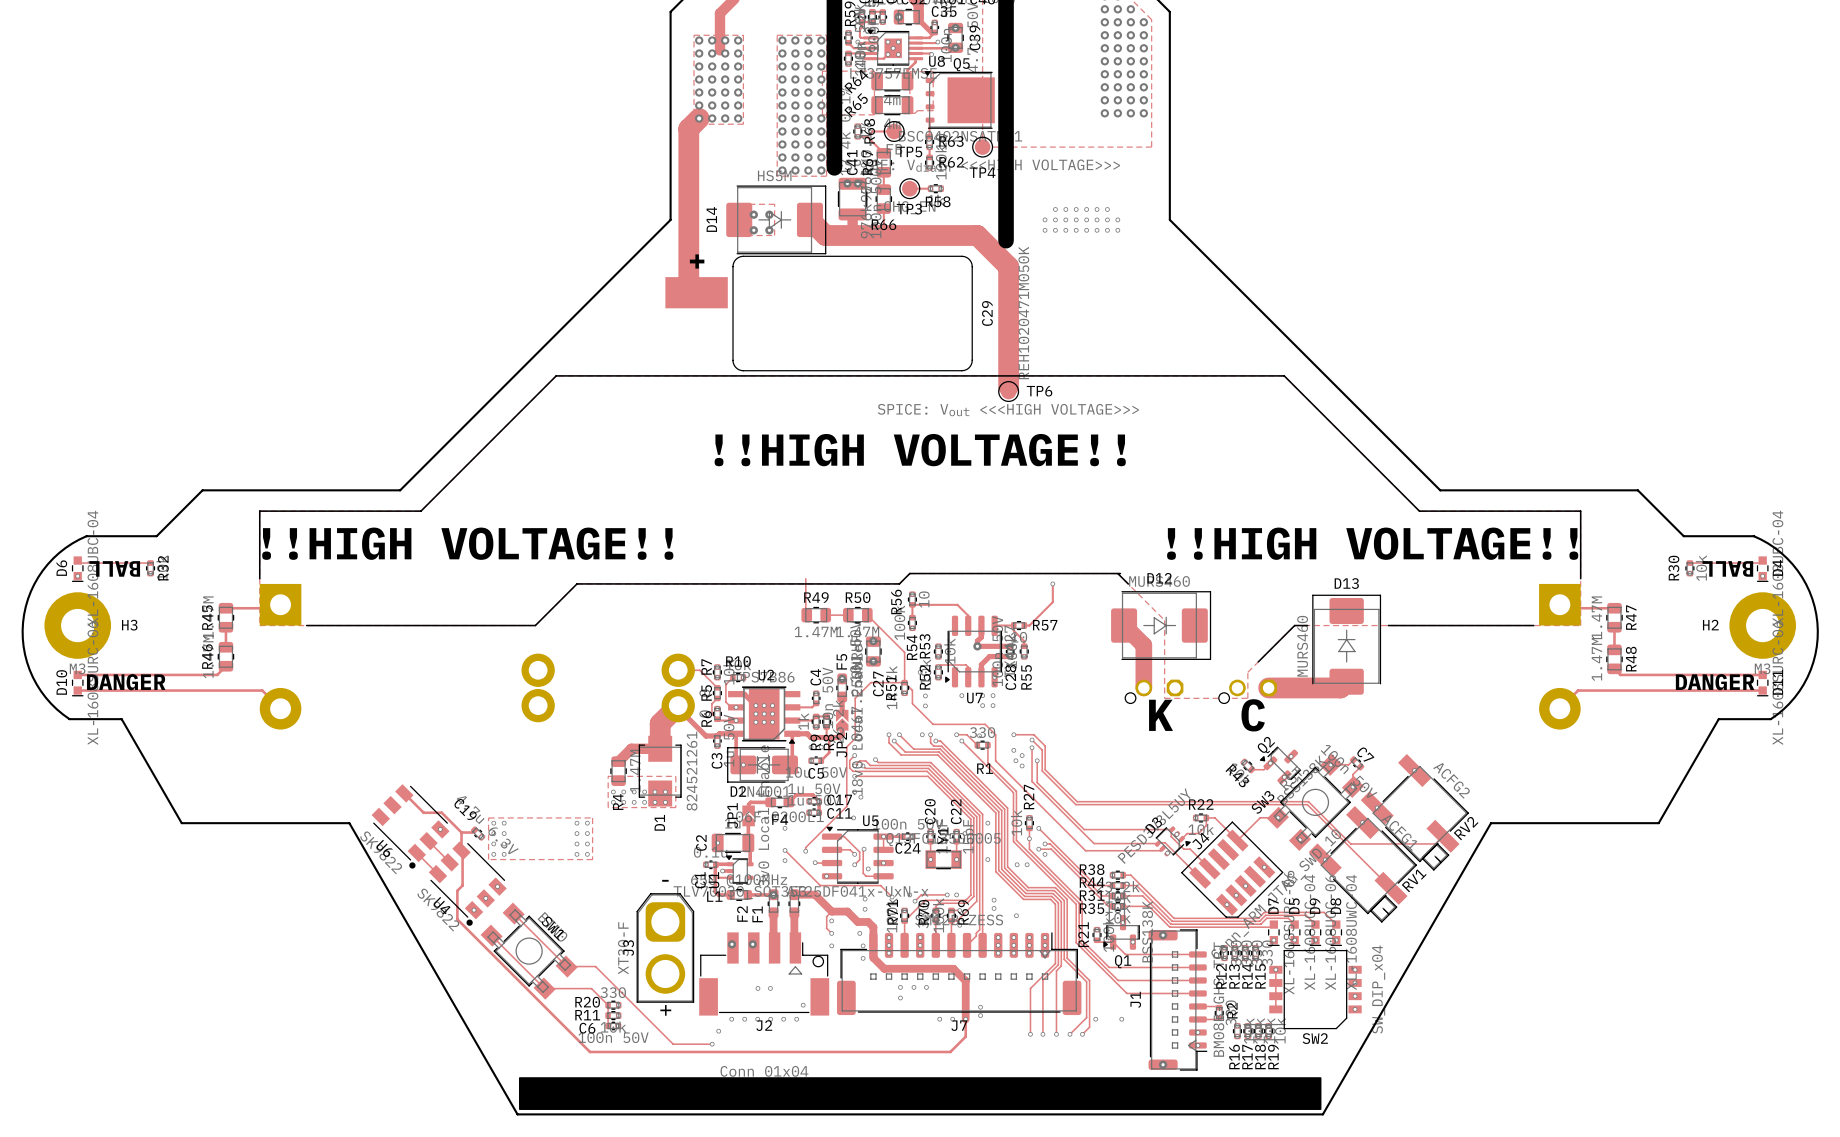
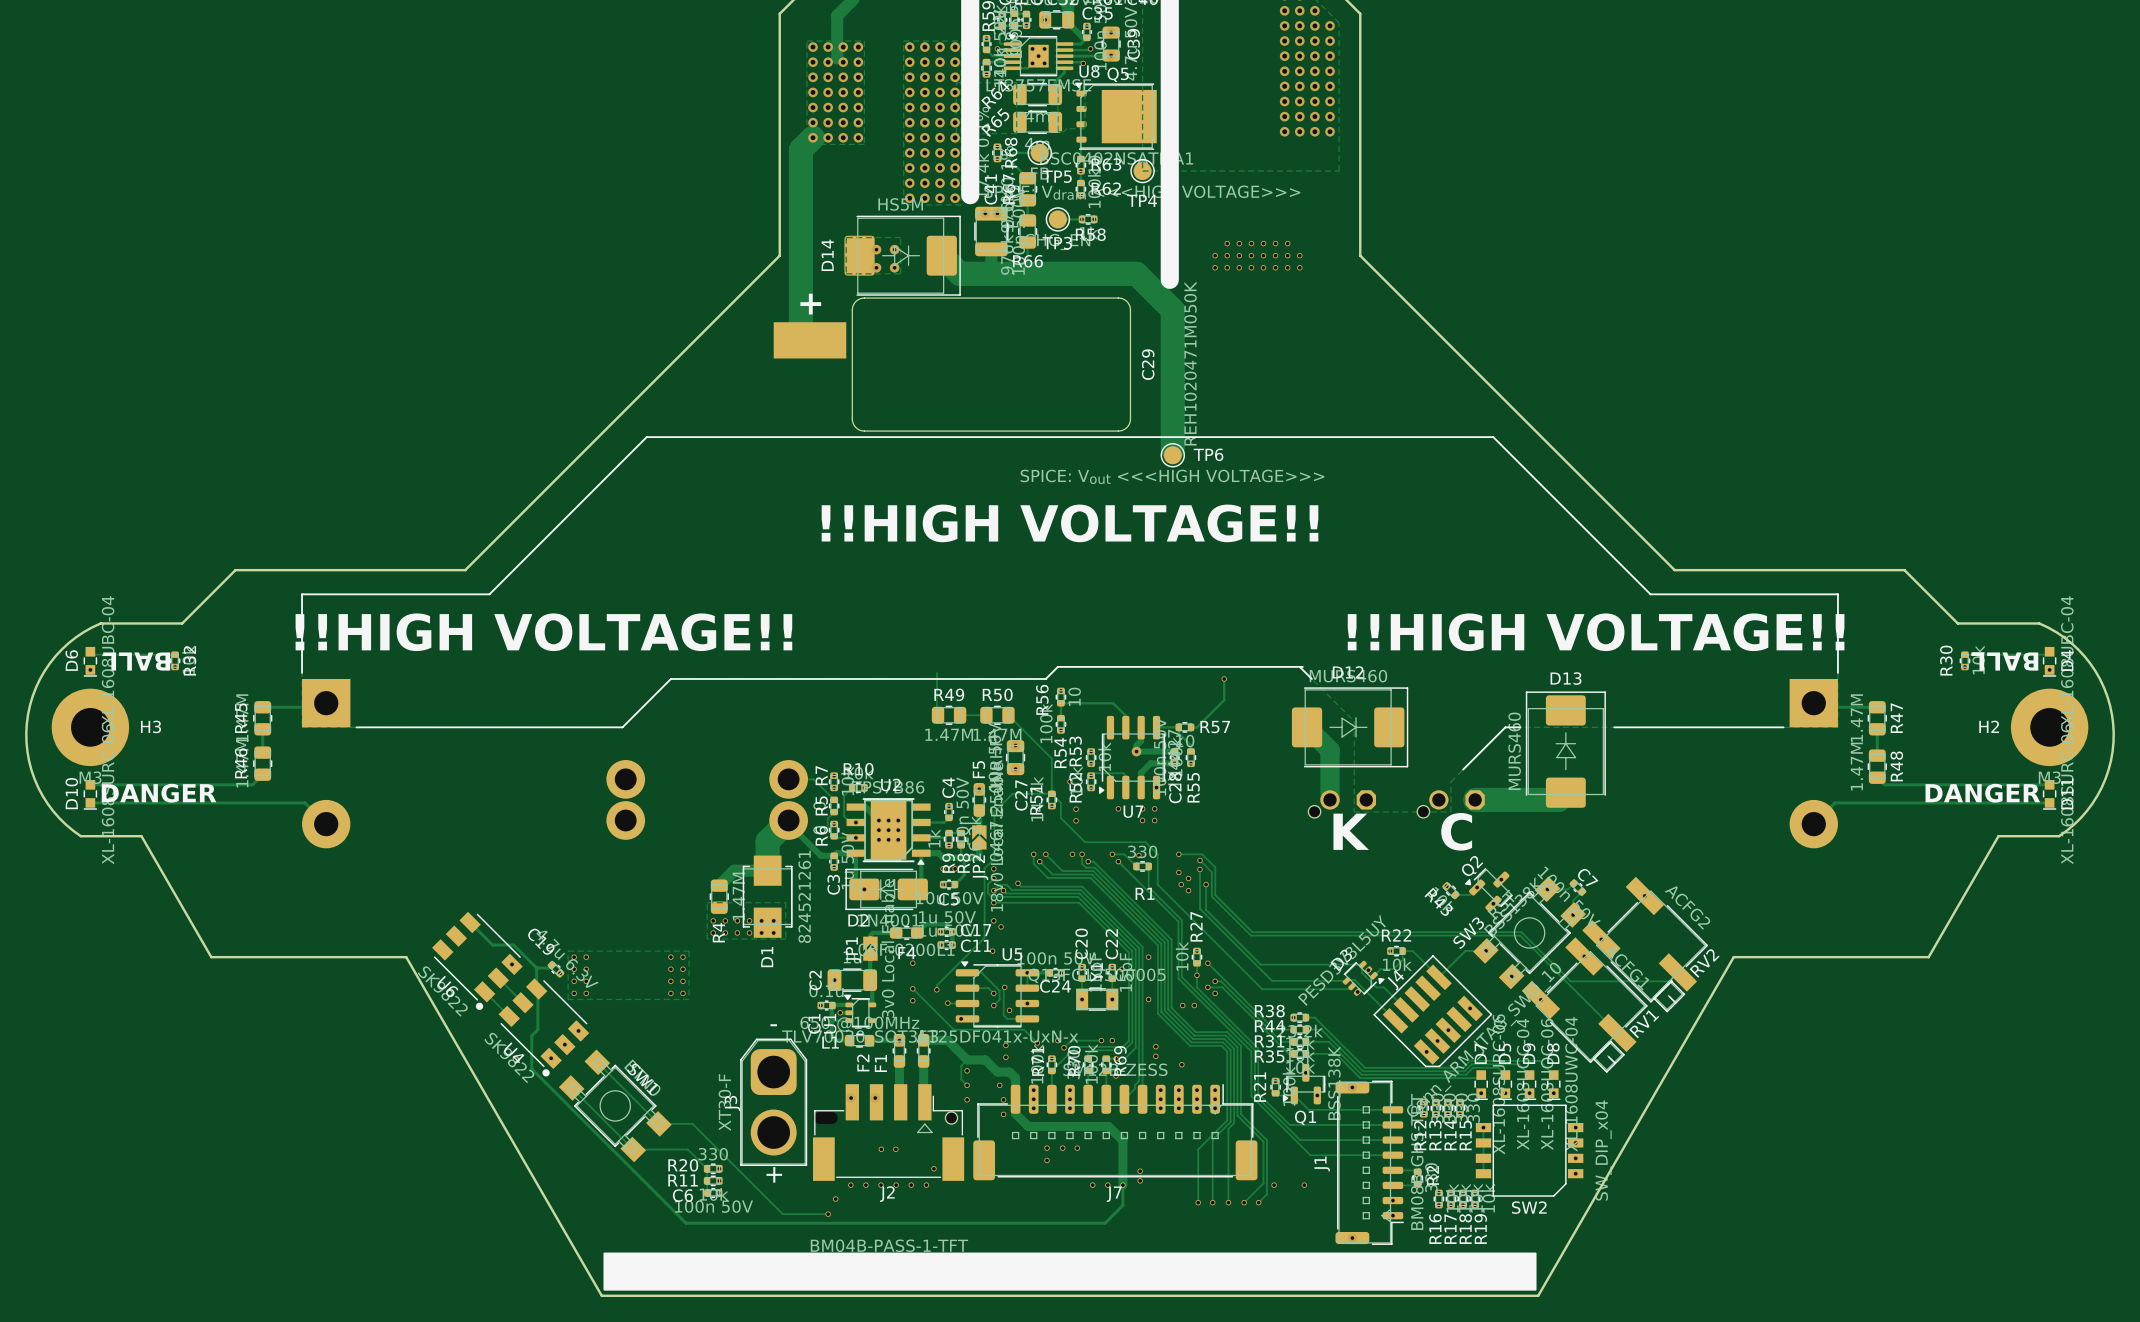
J2 value: Conn_01x04 (764, 1072) -> BM04B-PASS-1-TFT (889, 1245)

